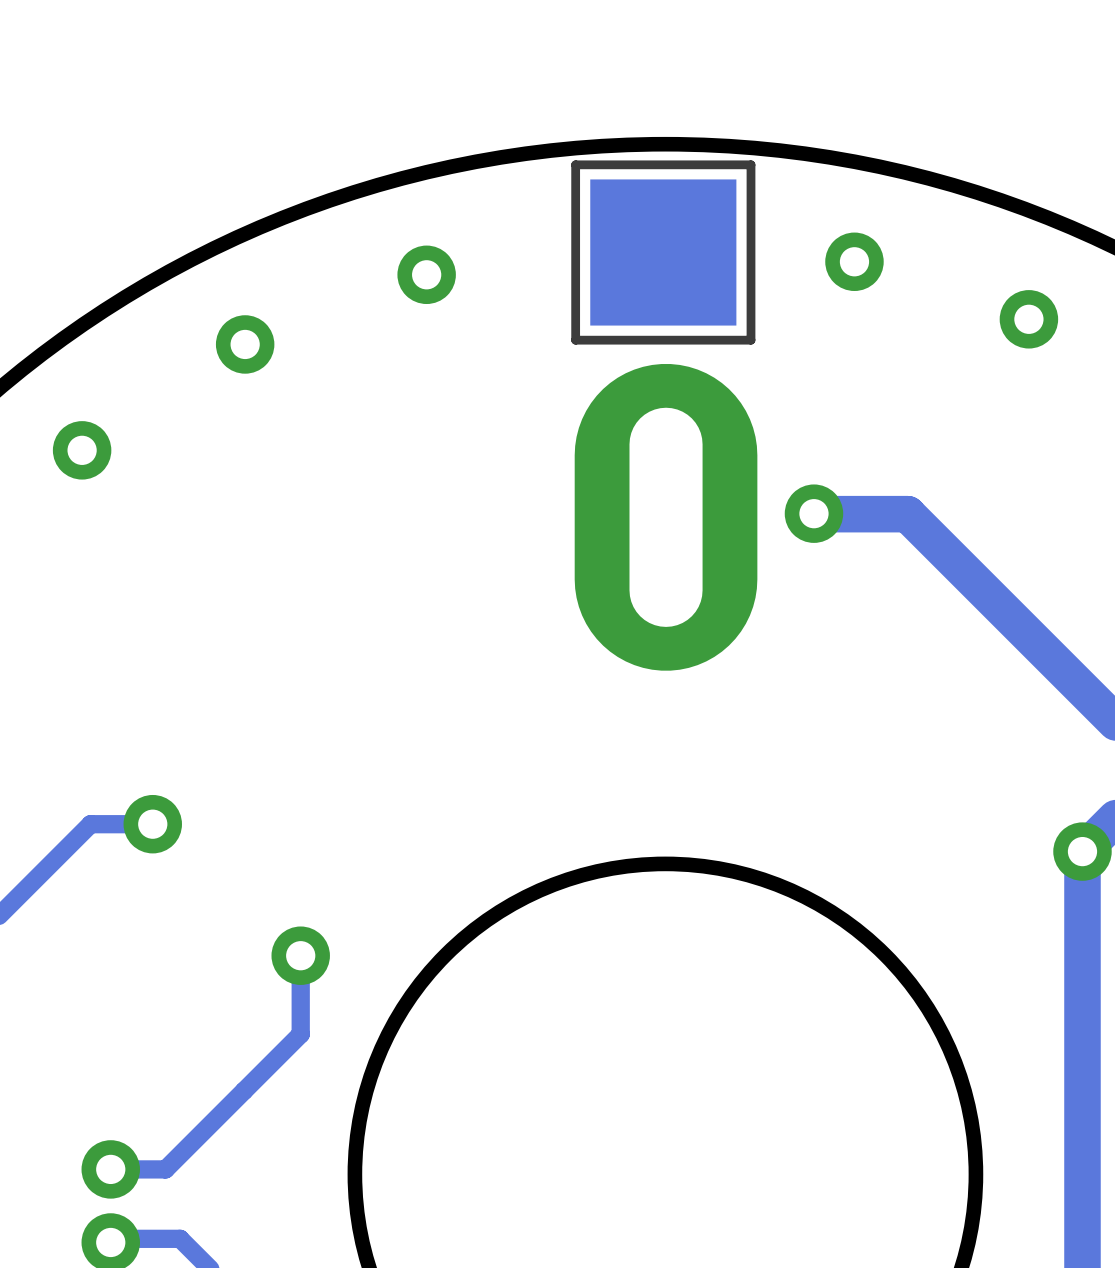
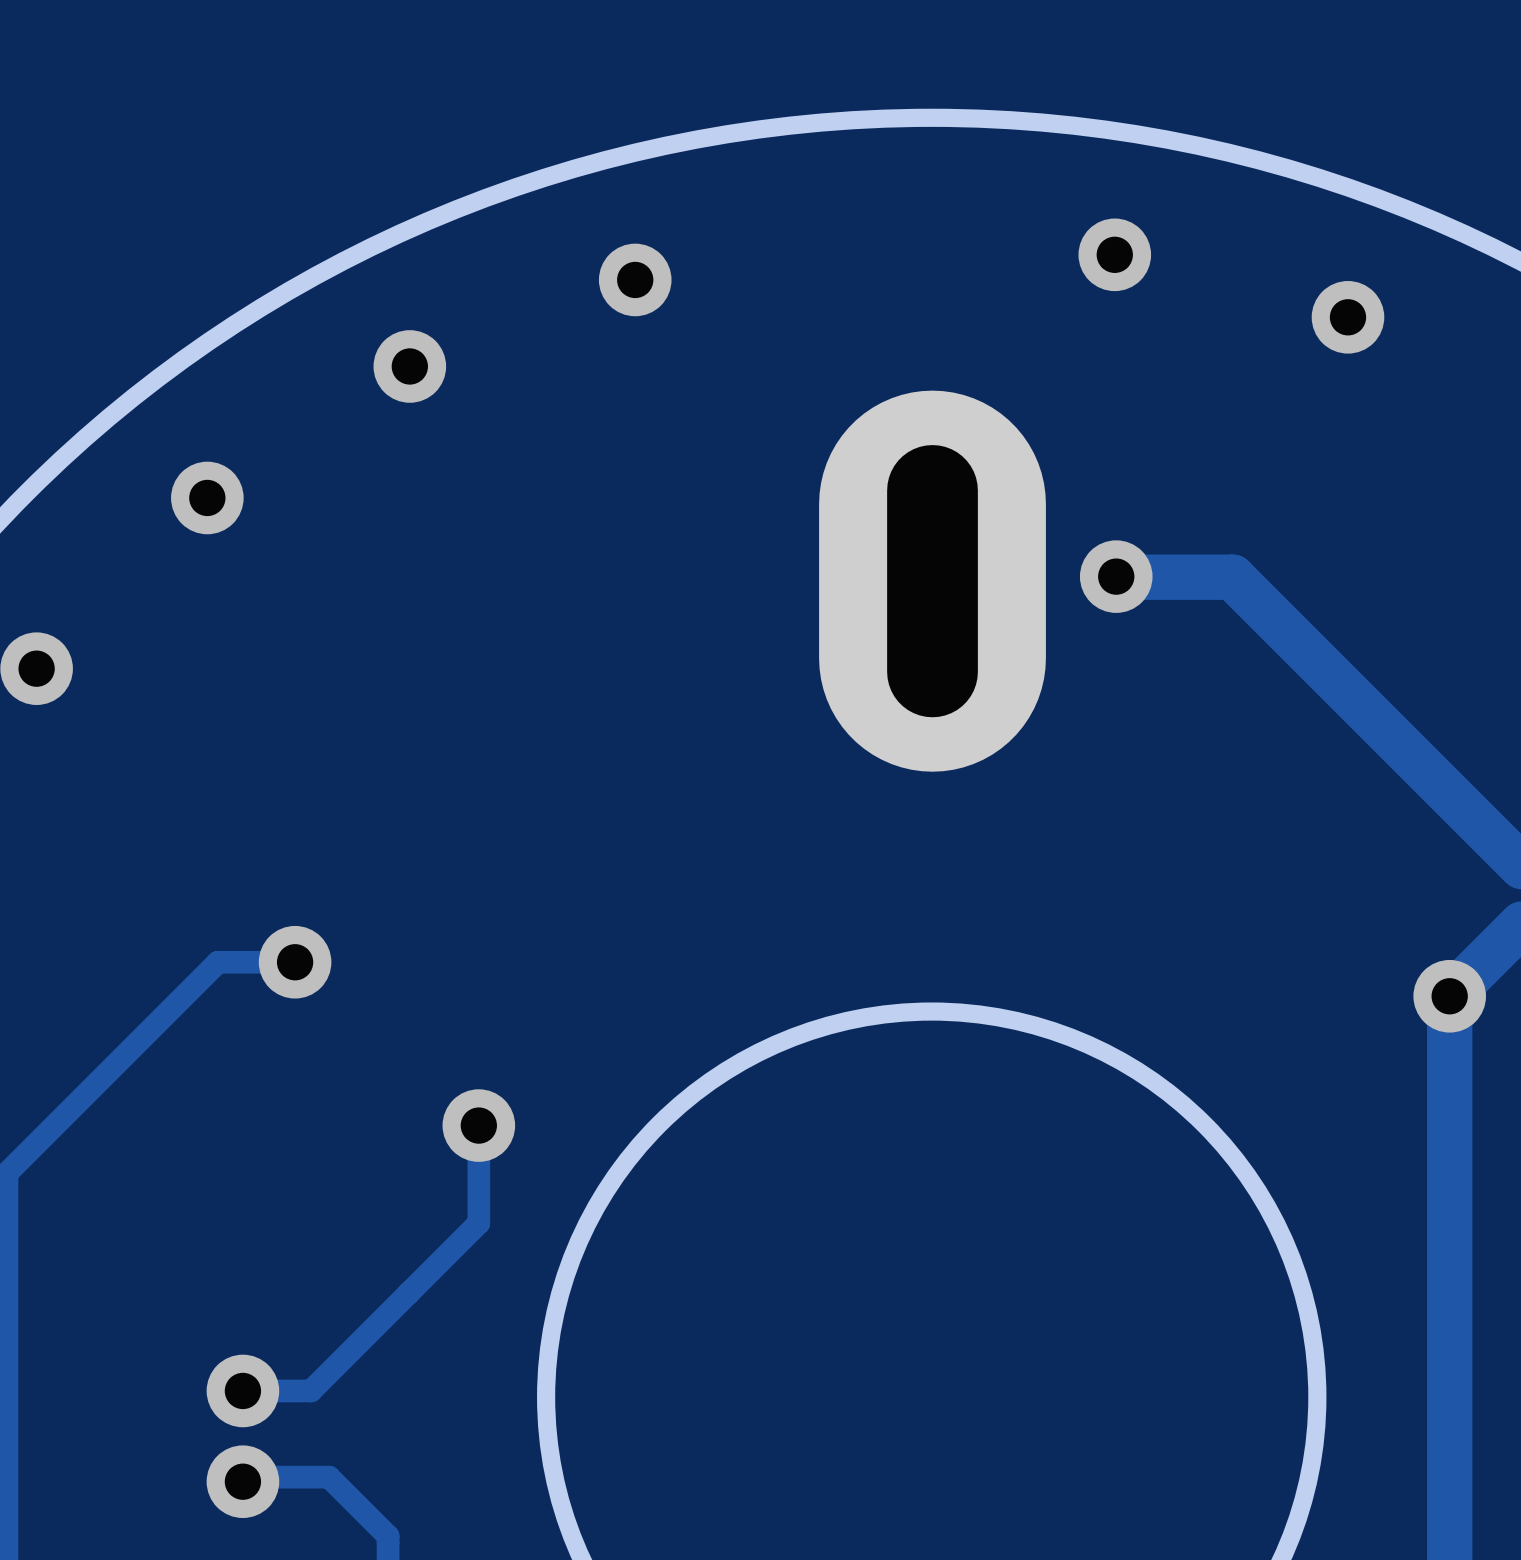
part: (663, 252) -> none
via position: (854, 261) -> (1114, 254)
via position: (1028, 319) -> (1347, 317)

